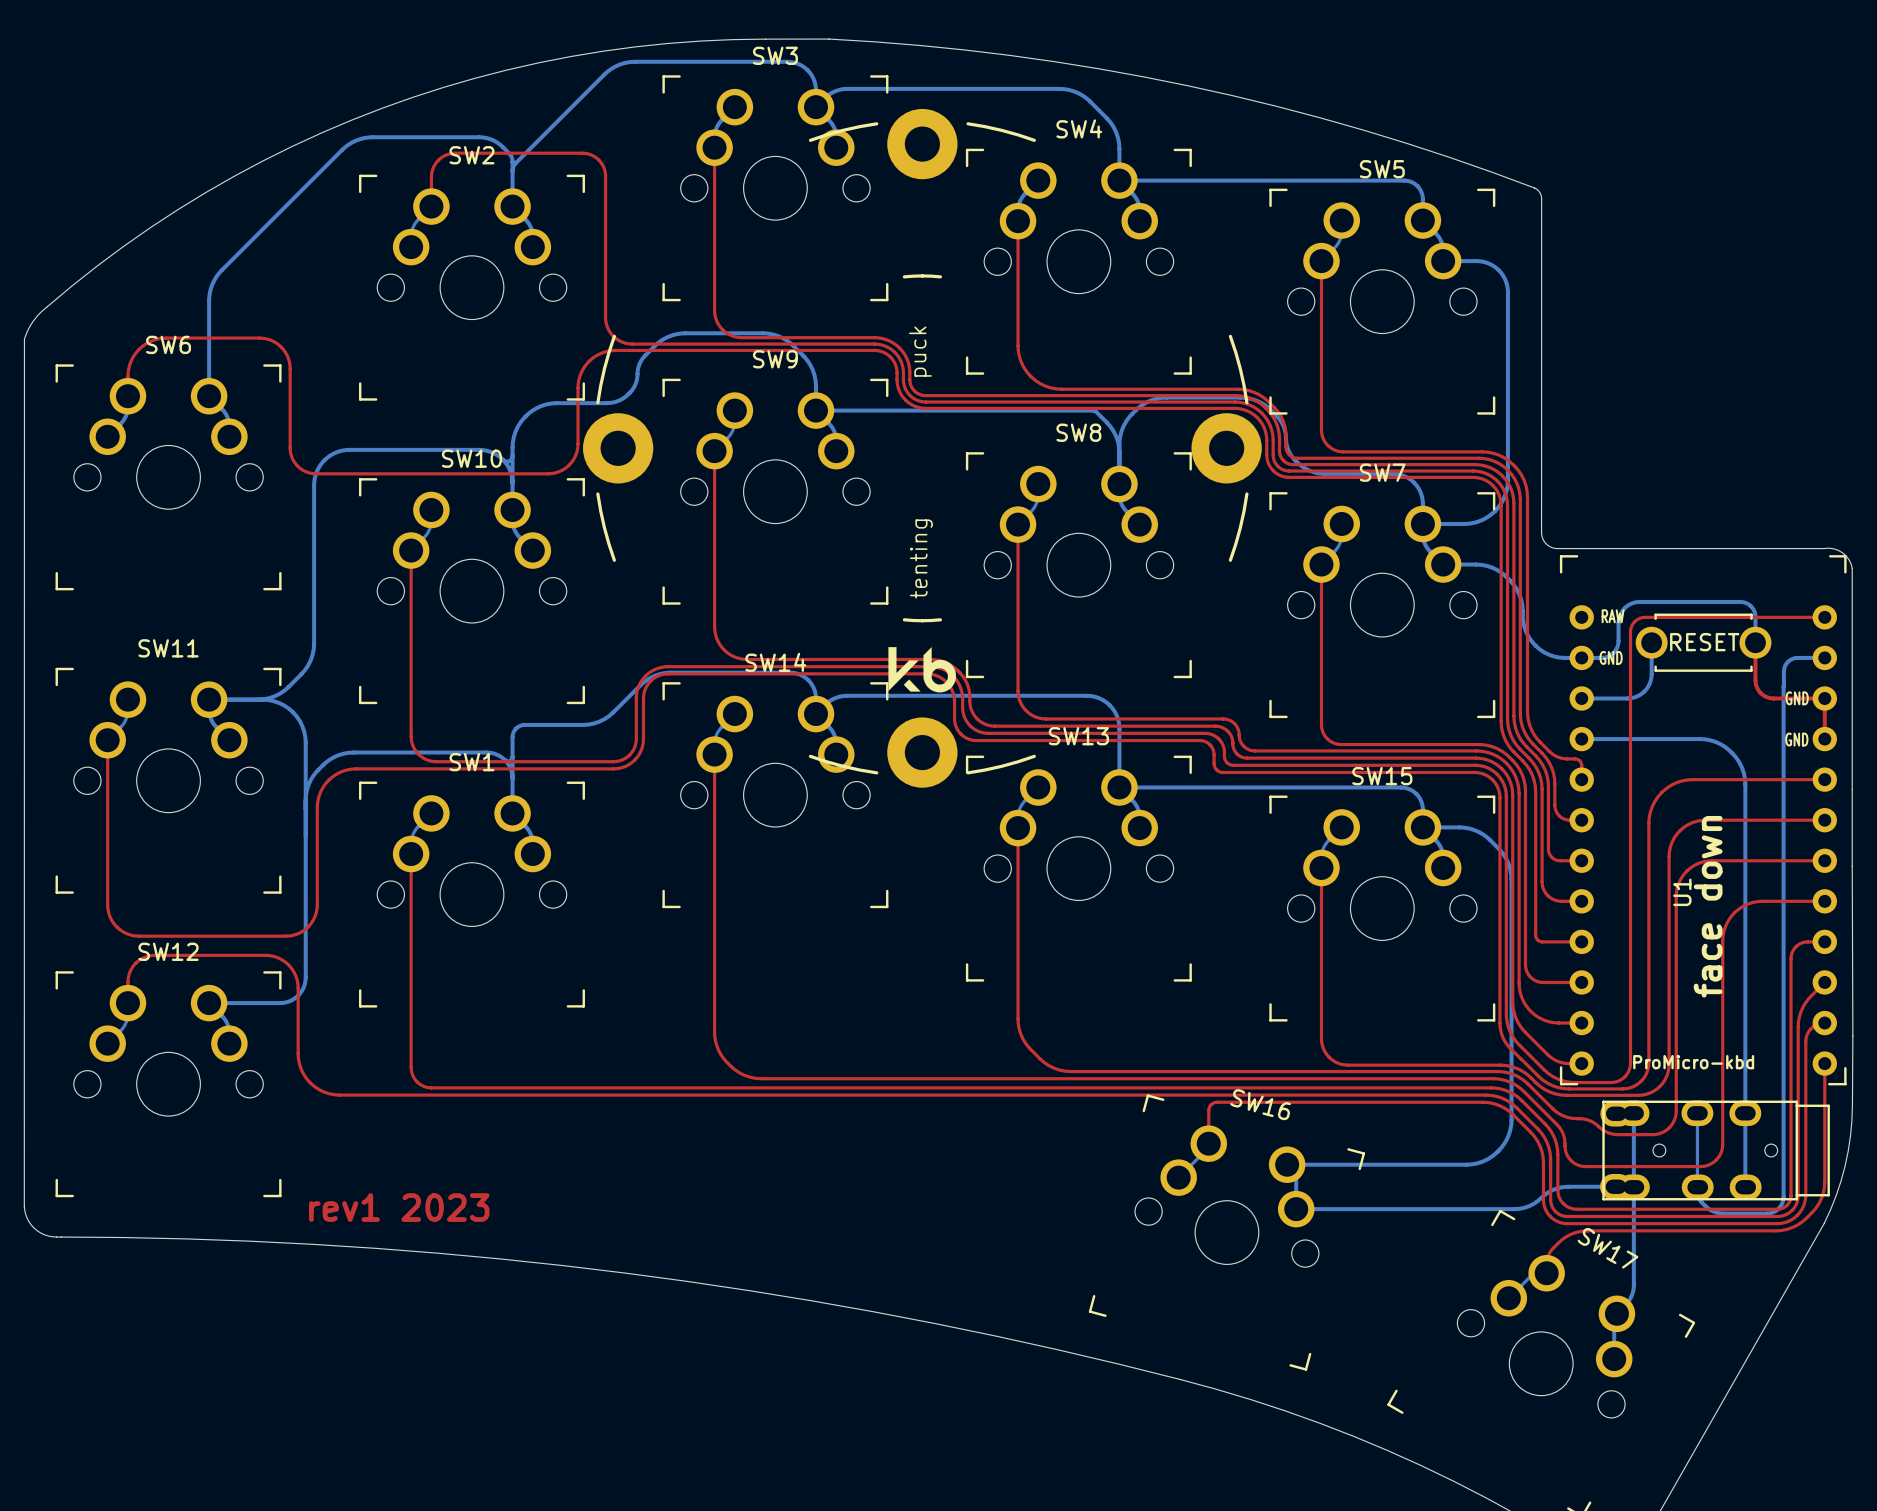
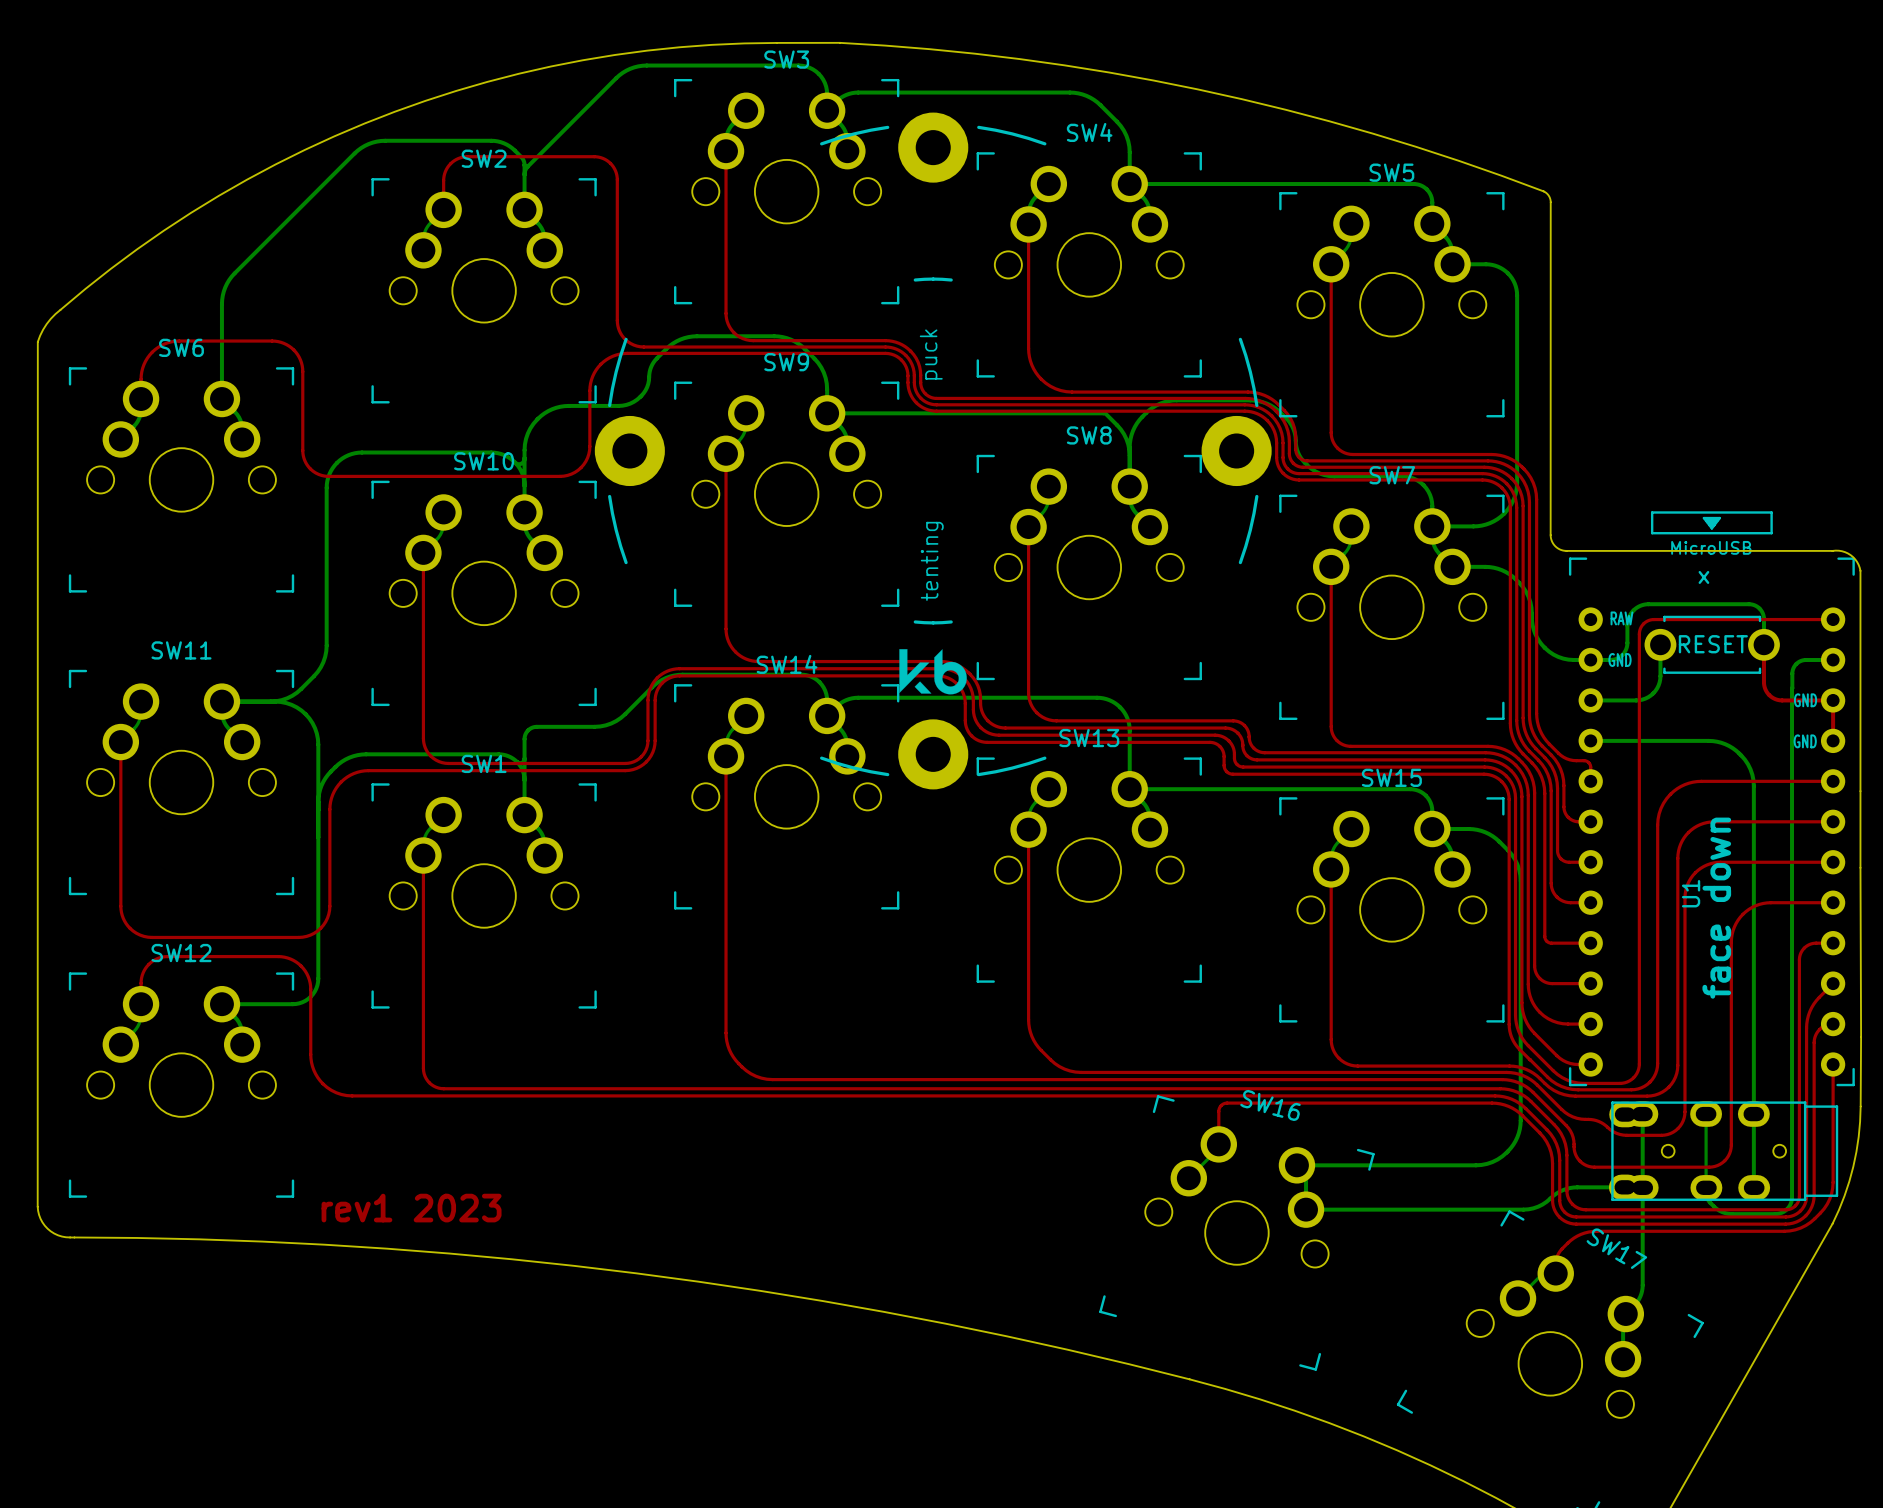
U1 footprint: [1559, 555, 1847, 1086] -> [1568, 511, 1855, 1087]
U1 value: ProMicro-kbd (1693, 1062) -> none

